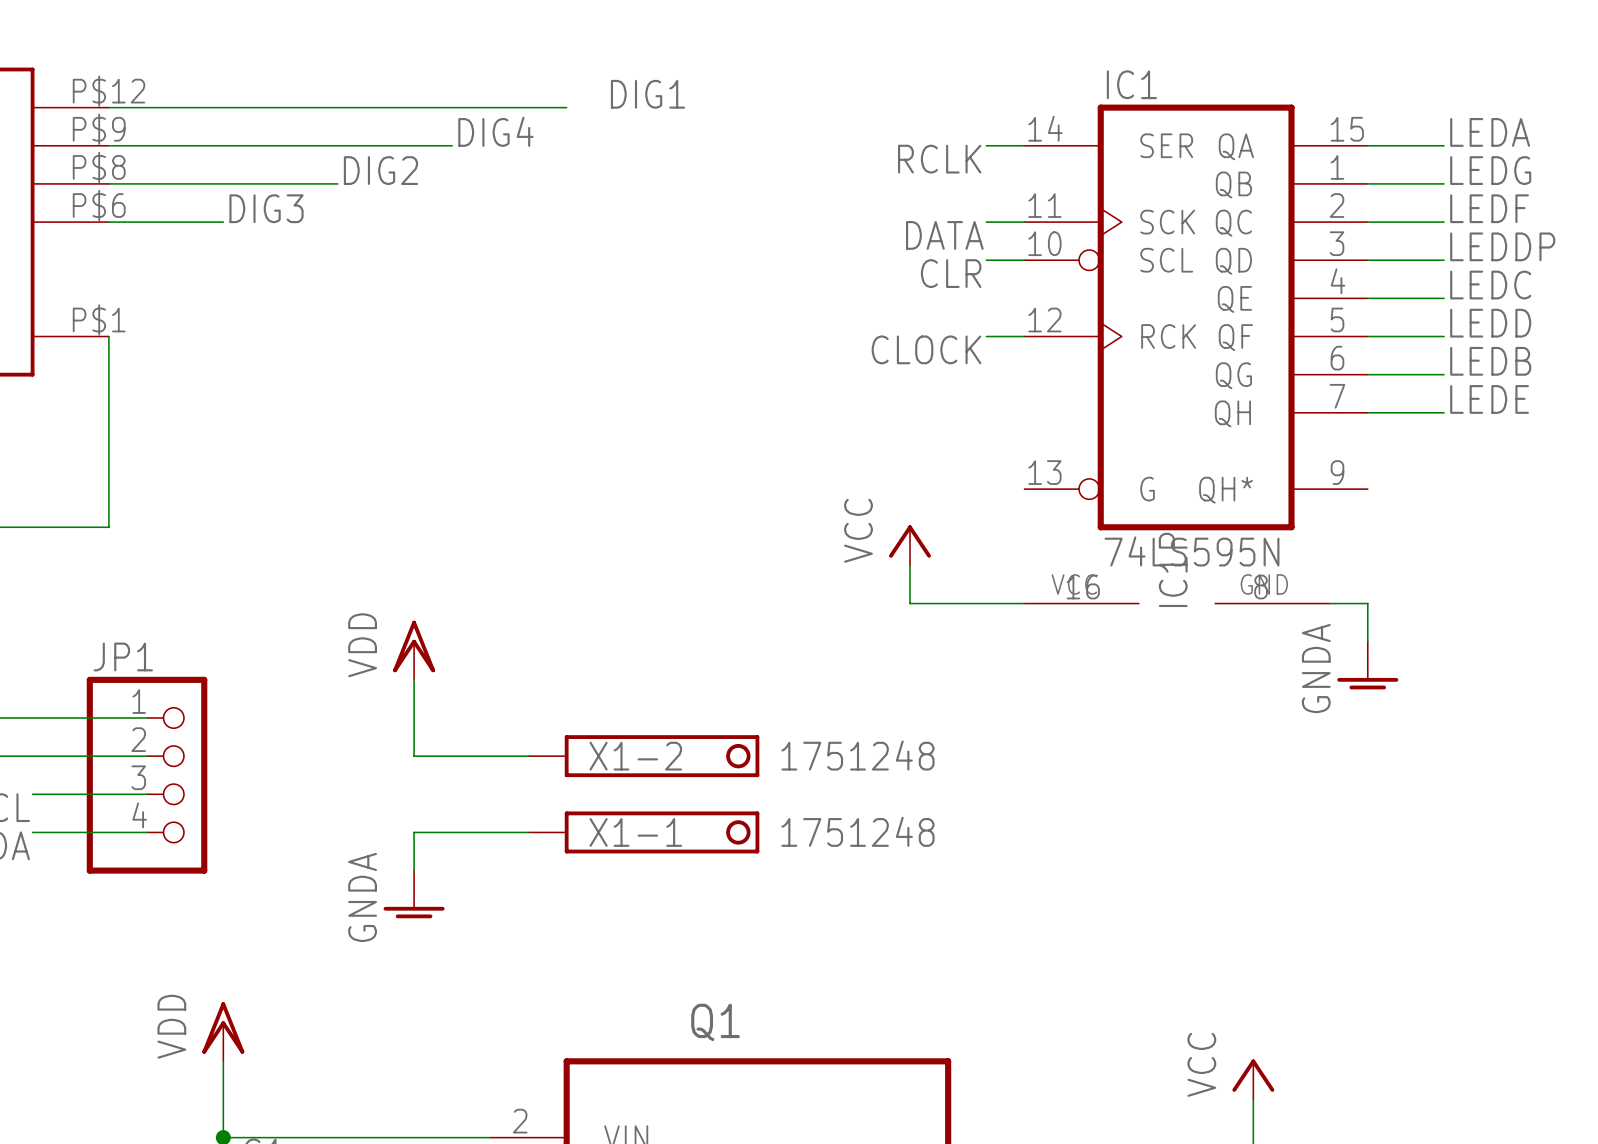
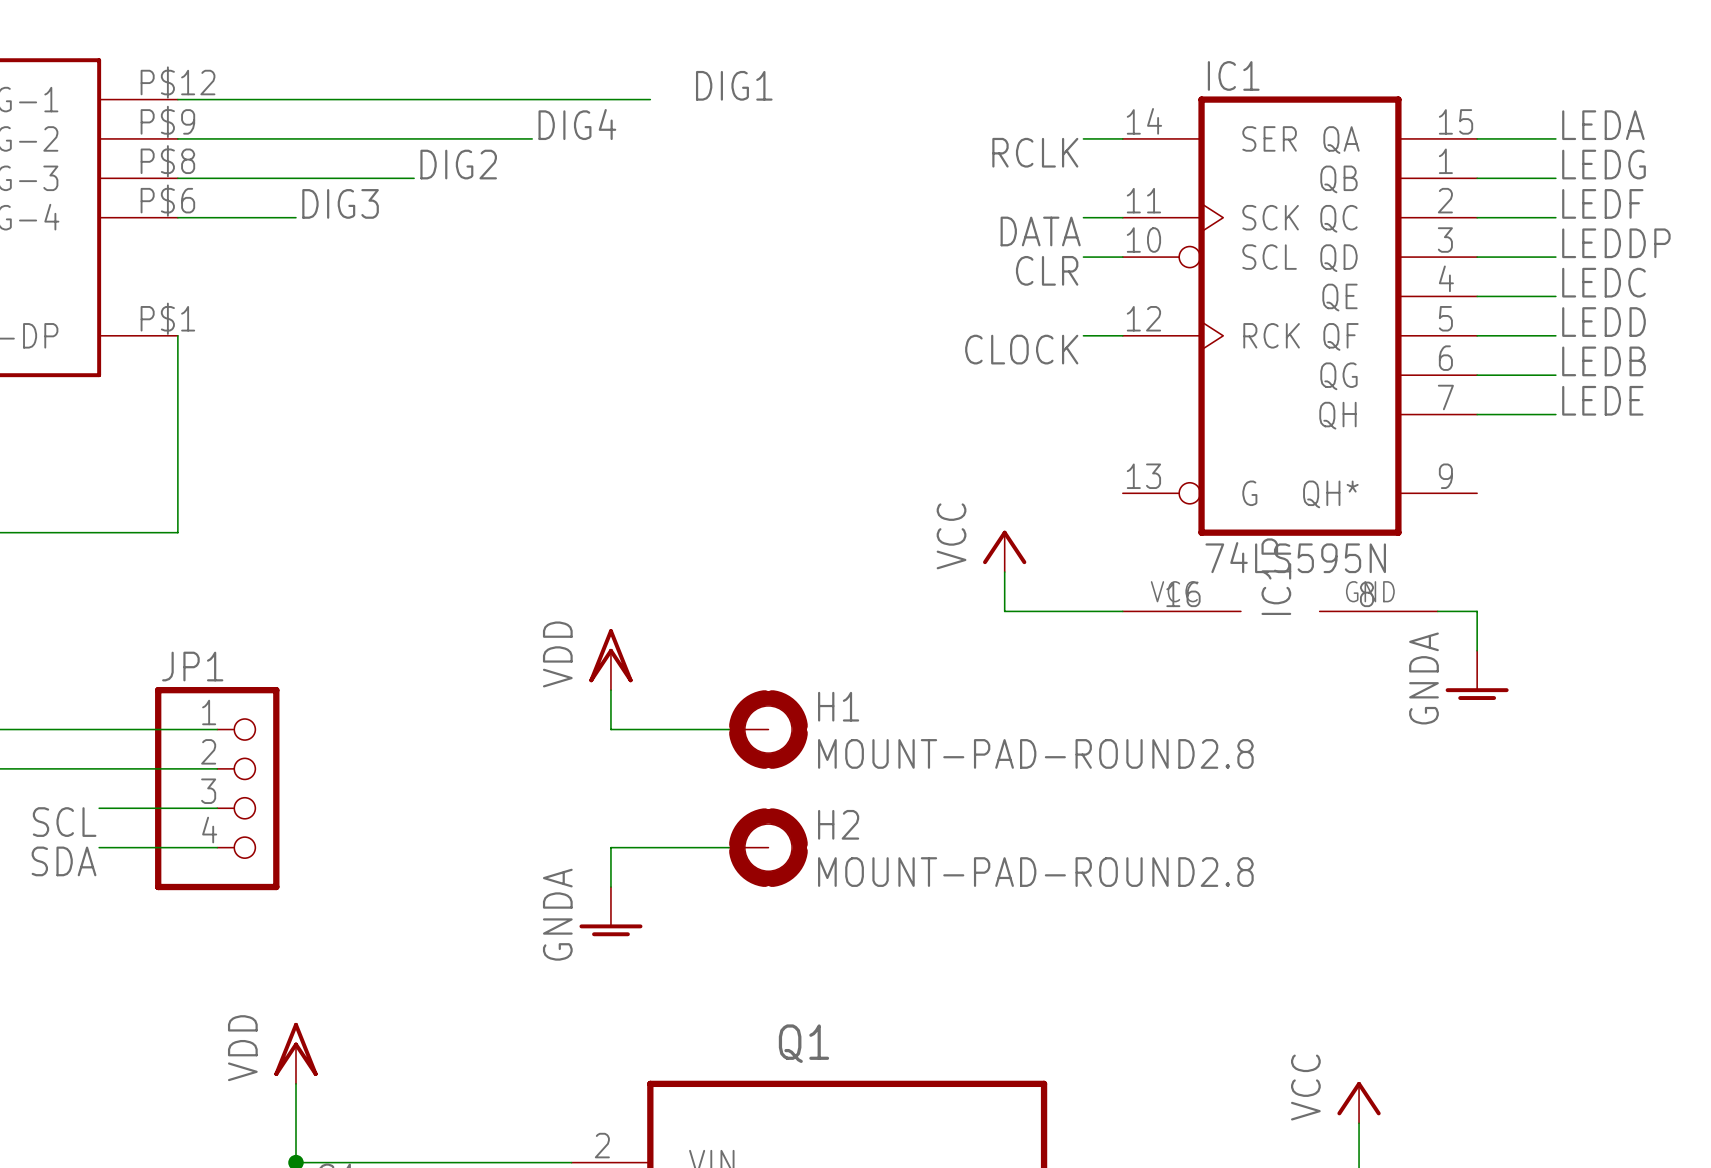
power symbol position: VDD (414, 650) -> VDD (610, 659)
wire: (414, 679) (414, 756) (528, 756) -> none
wire: none -> (610, 690) (610, 729) (729, 729)
H1: none -> MOUNT-PAD-ROUND2.8 (768, 729)
X1-2: 1751248 (643, 756) -> none
wire: (528, 832) (414, 832) (414, 870) -> (729, 847) (610, 847) (610, 887)
X1-1: 1751248 (643, 832) -> none
H2: none -> MOUNT-PAD-ROUND2.8 (768, 847)
power symbol position: GNDA (414, 894) -> GNDA (610, 911)

